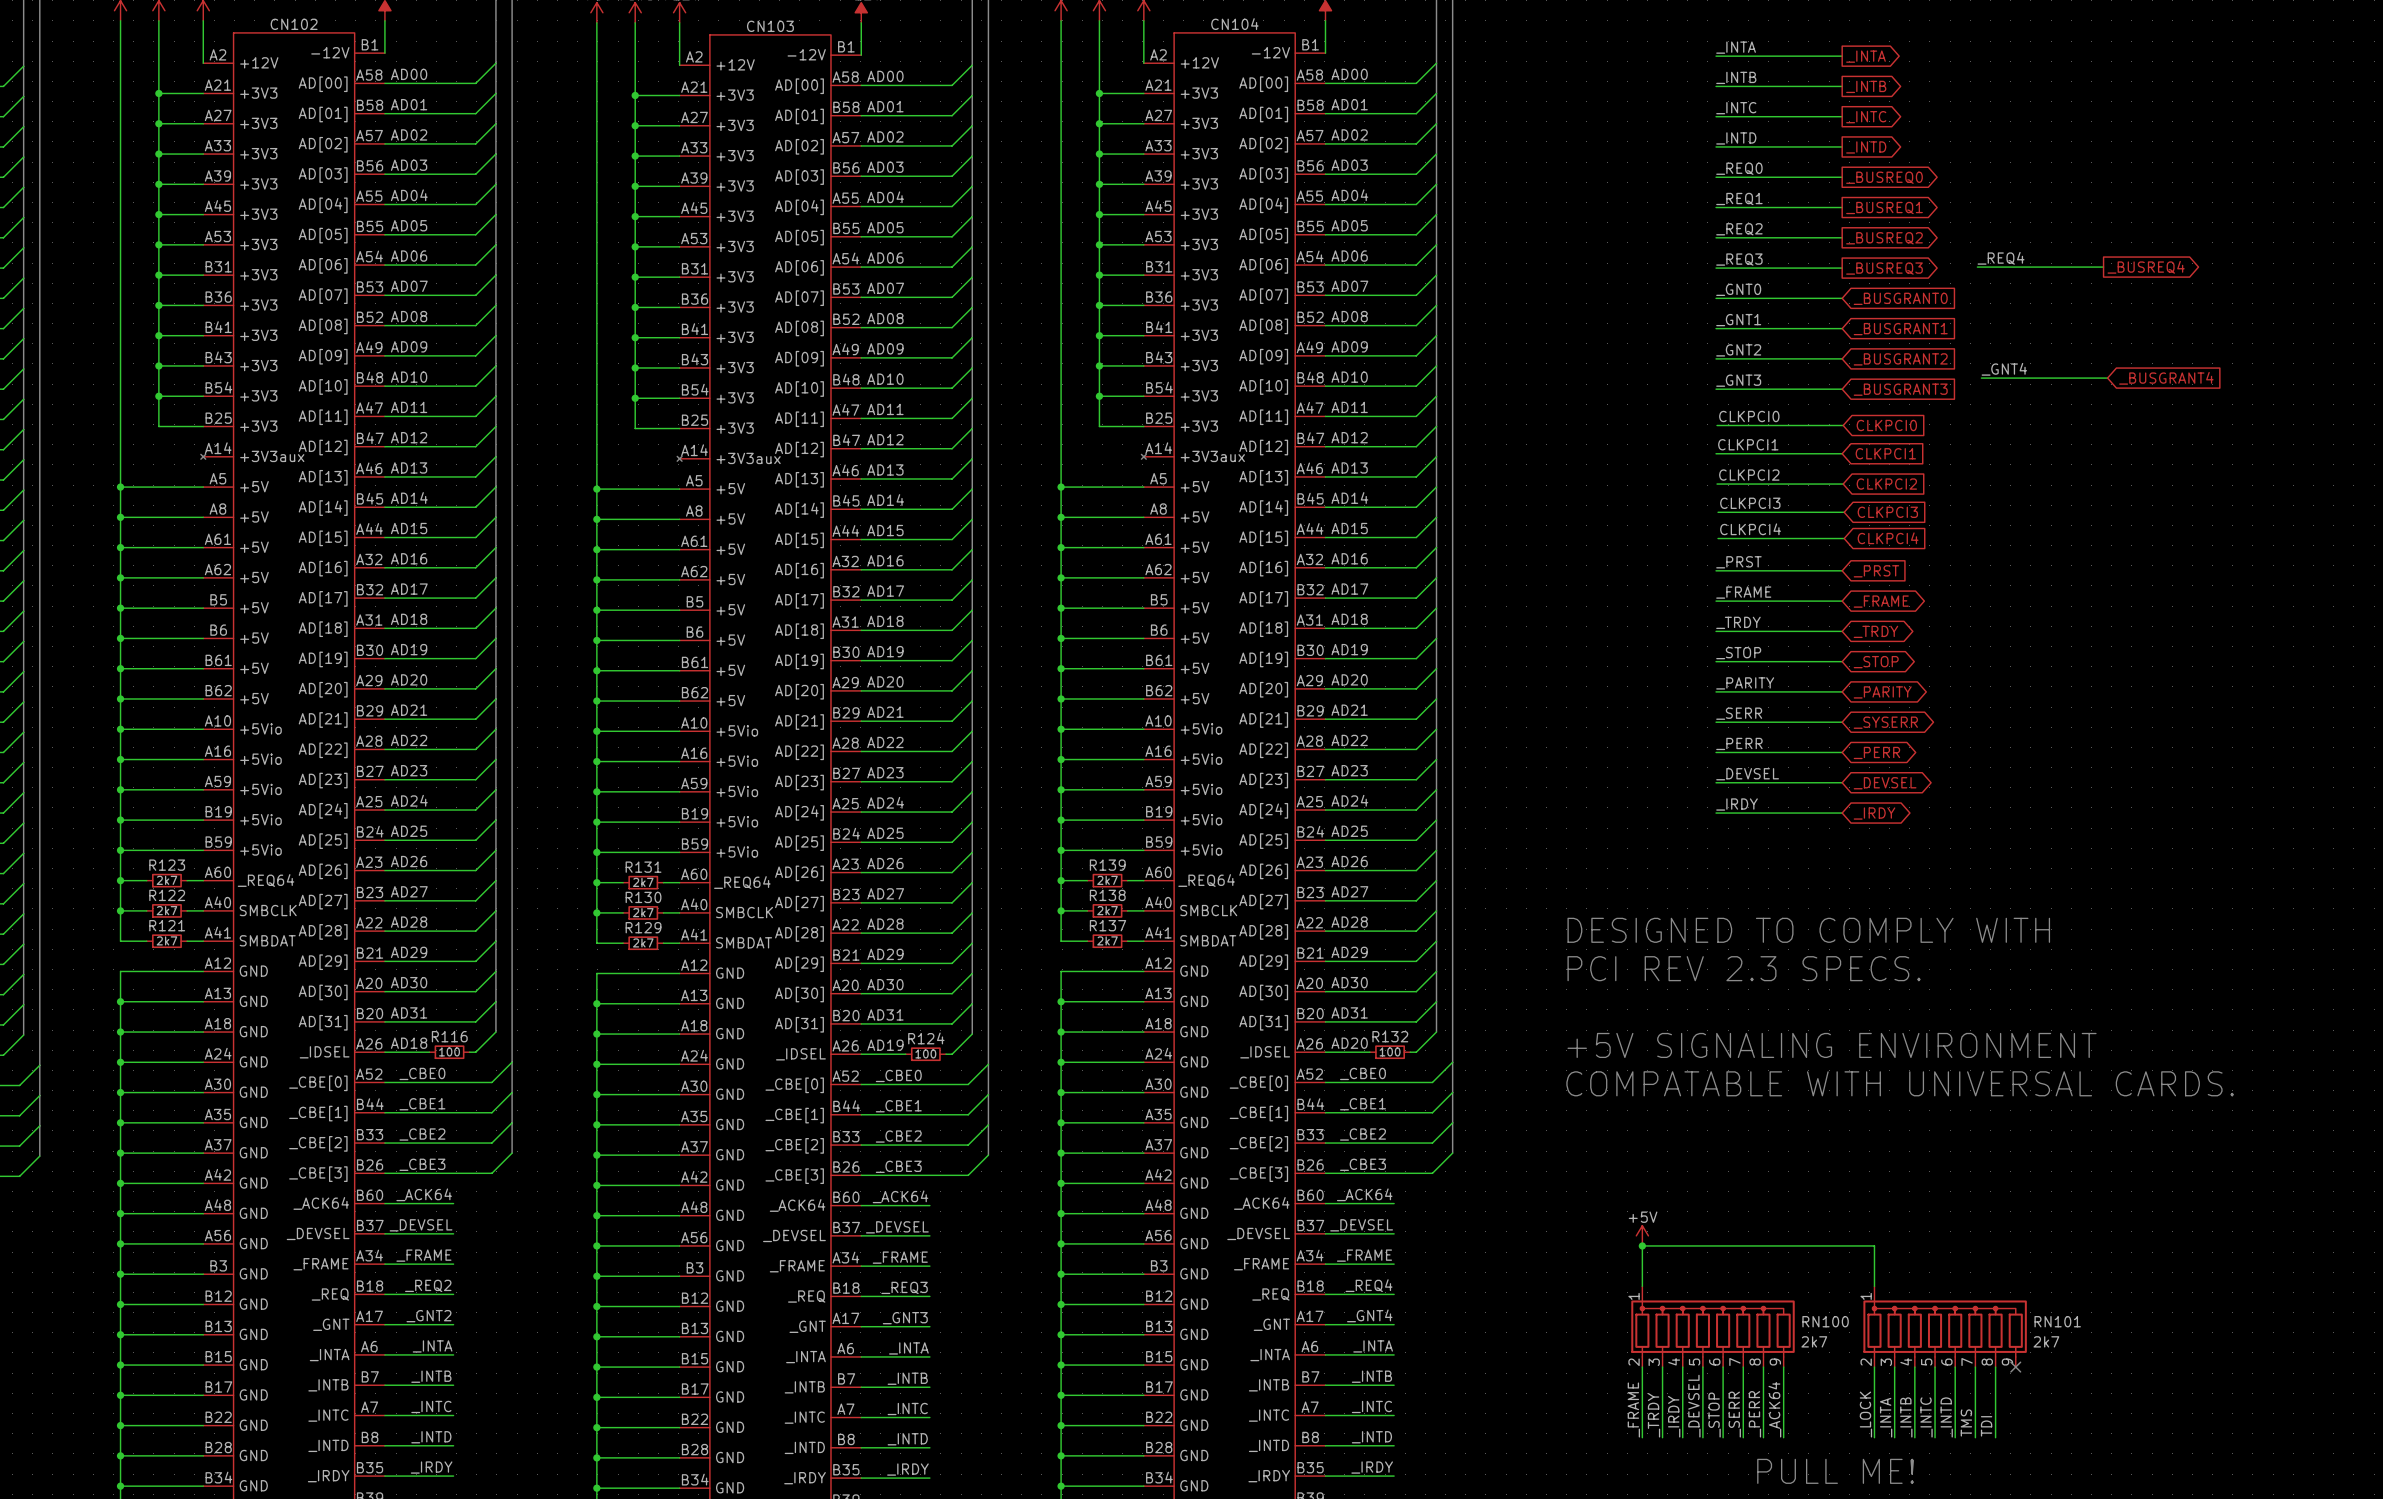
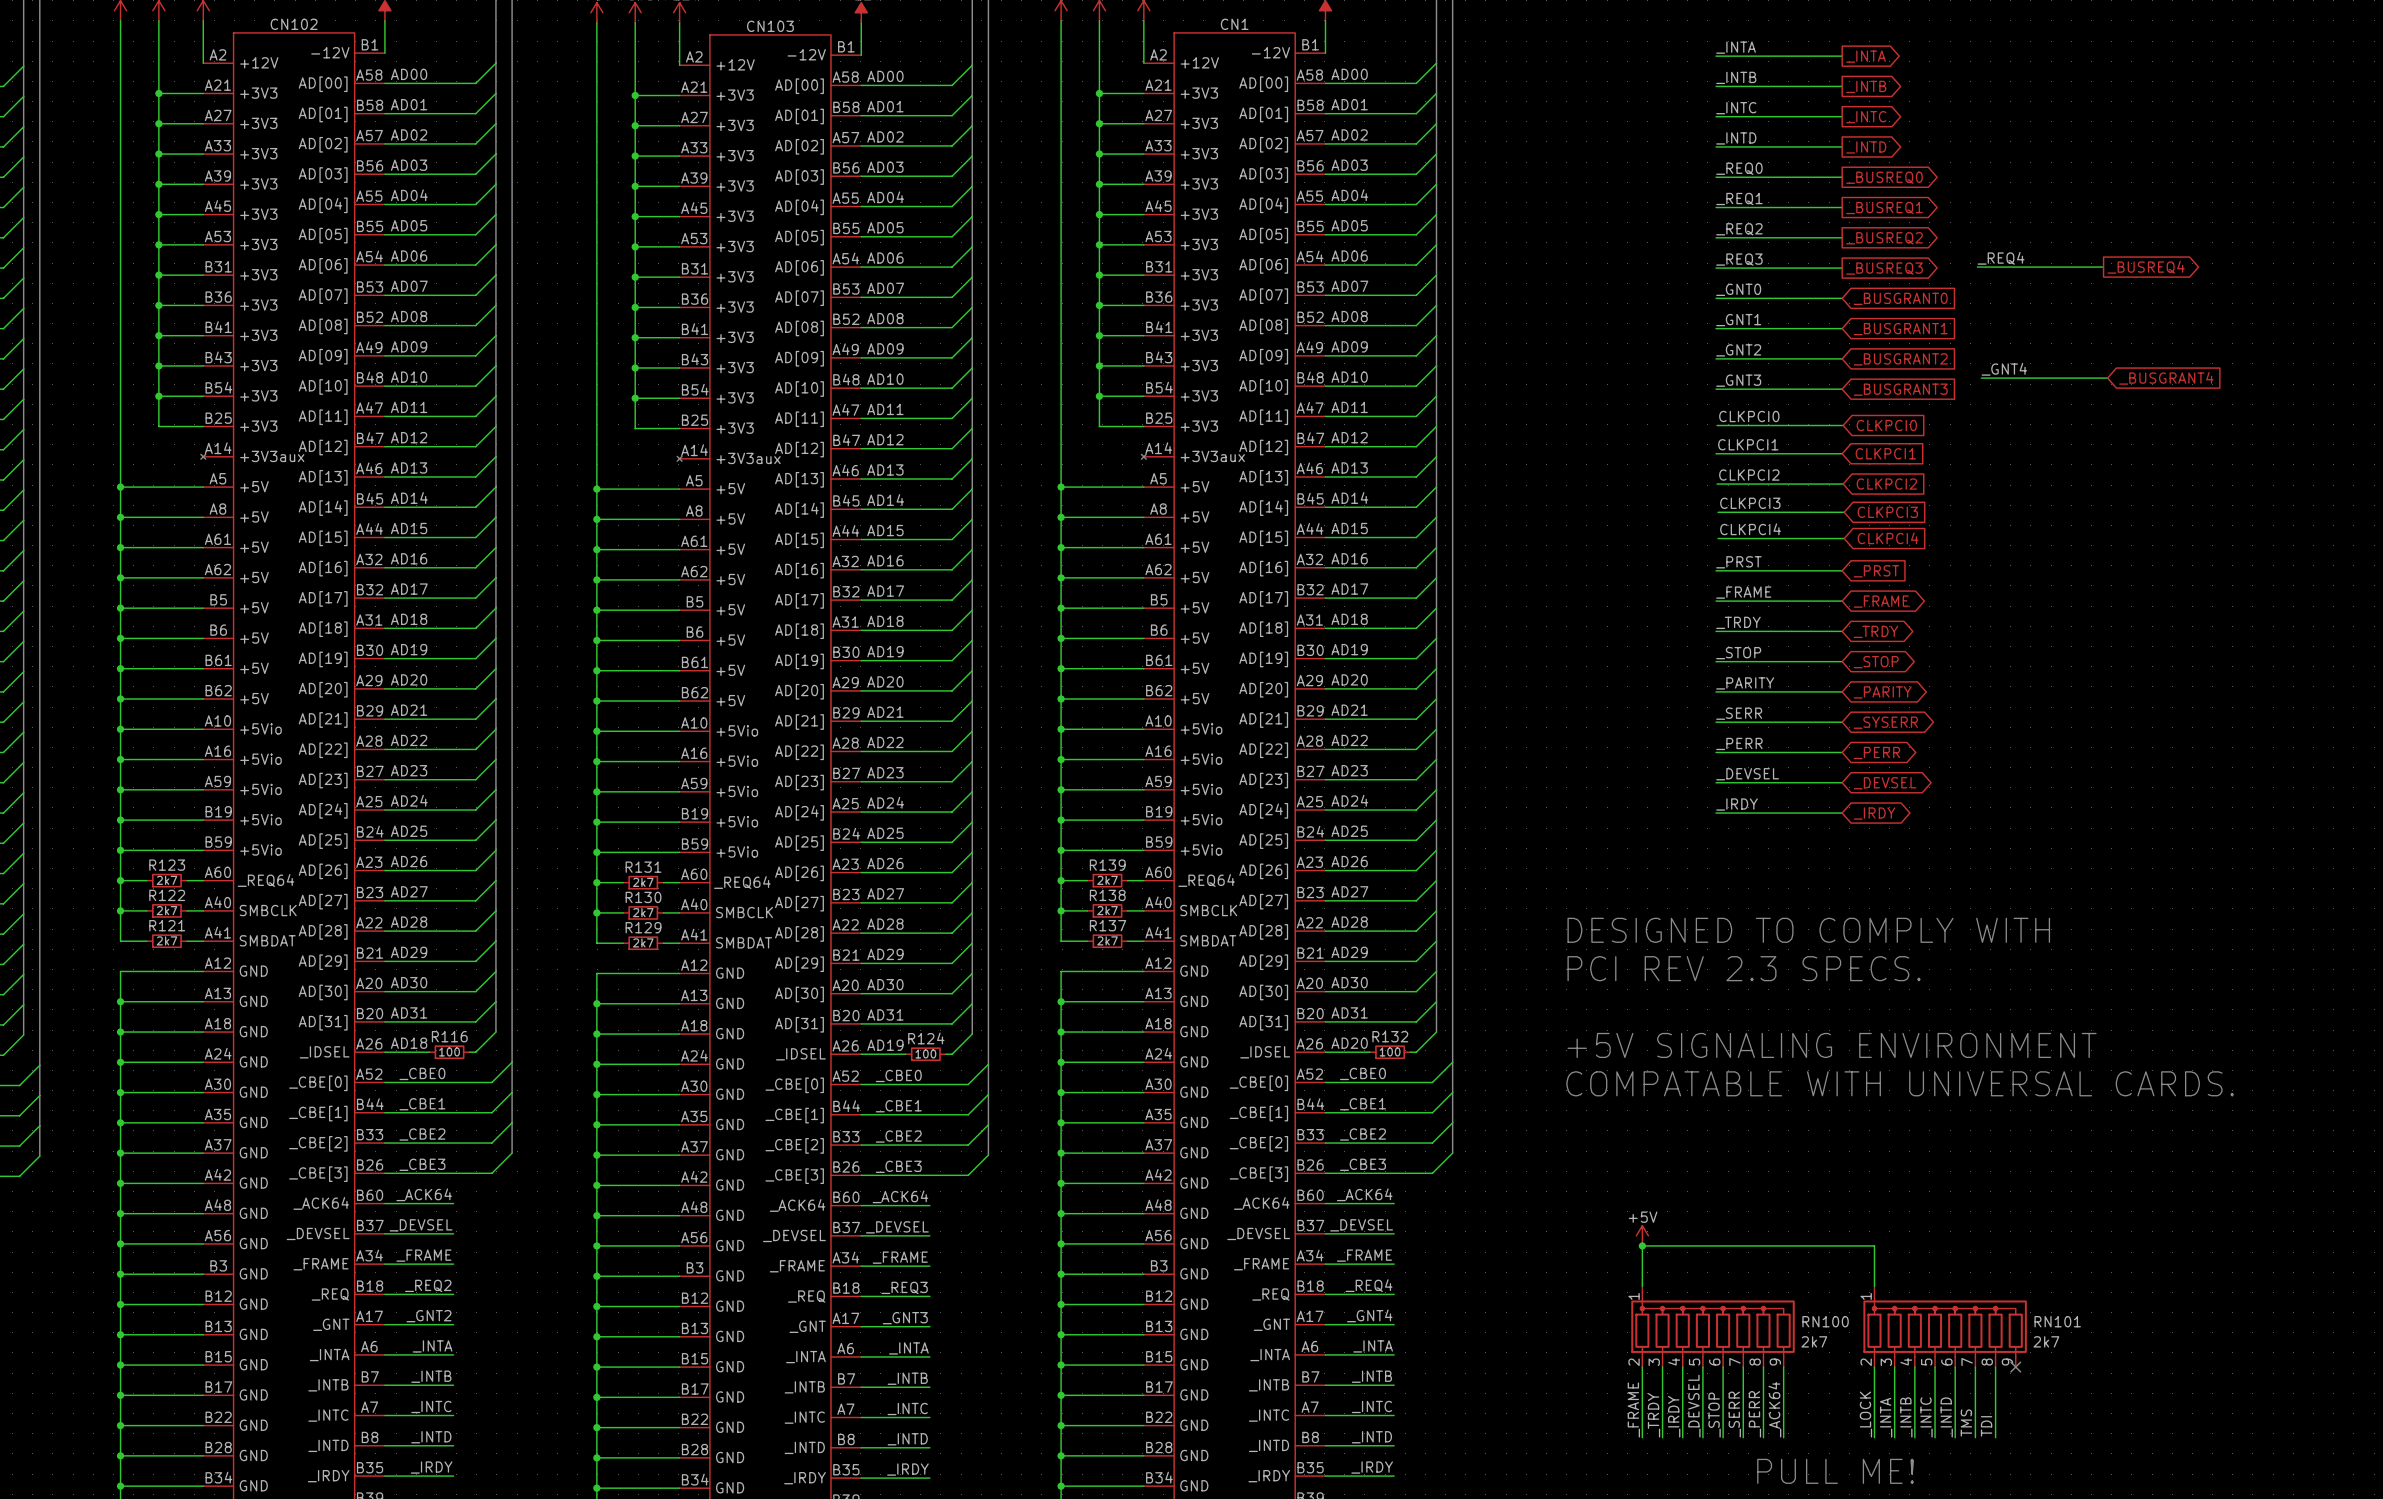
CN104 name: CN104 (1234, 24) -> CN1 (1234, 24)

